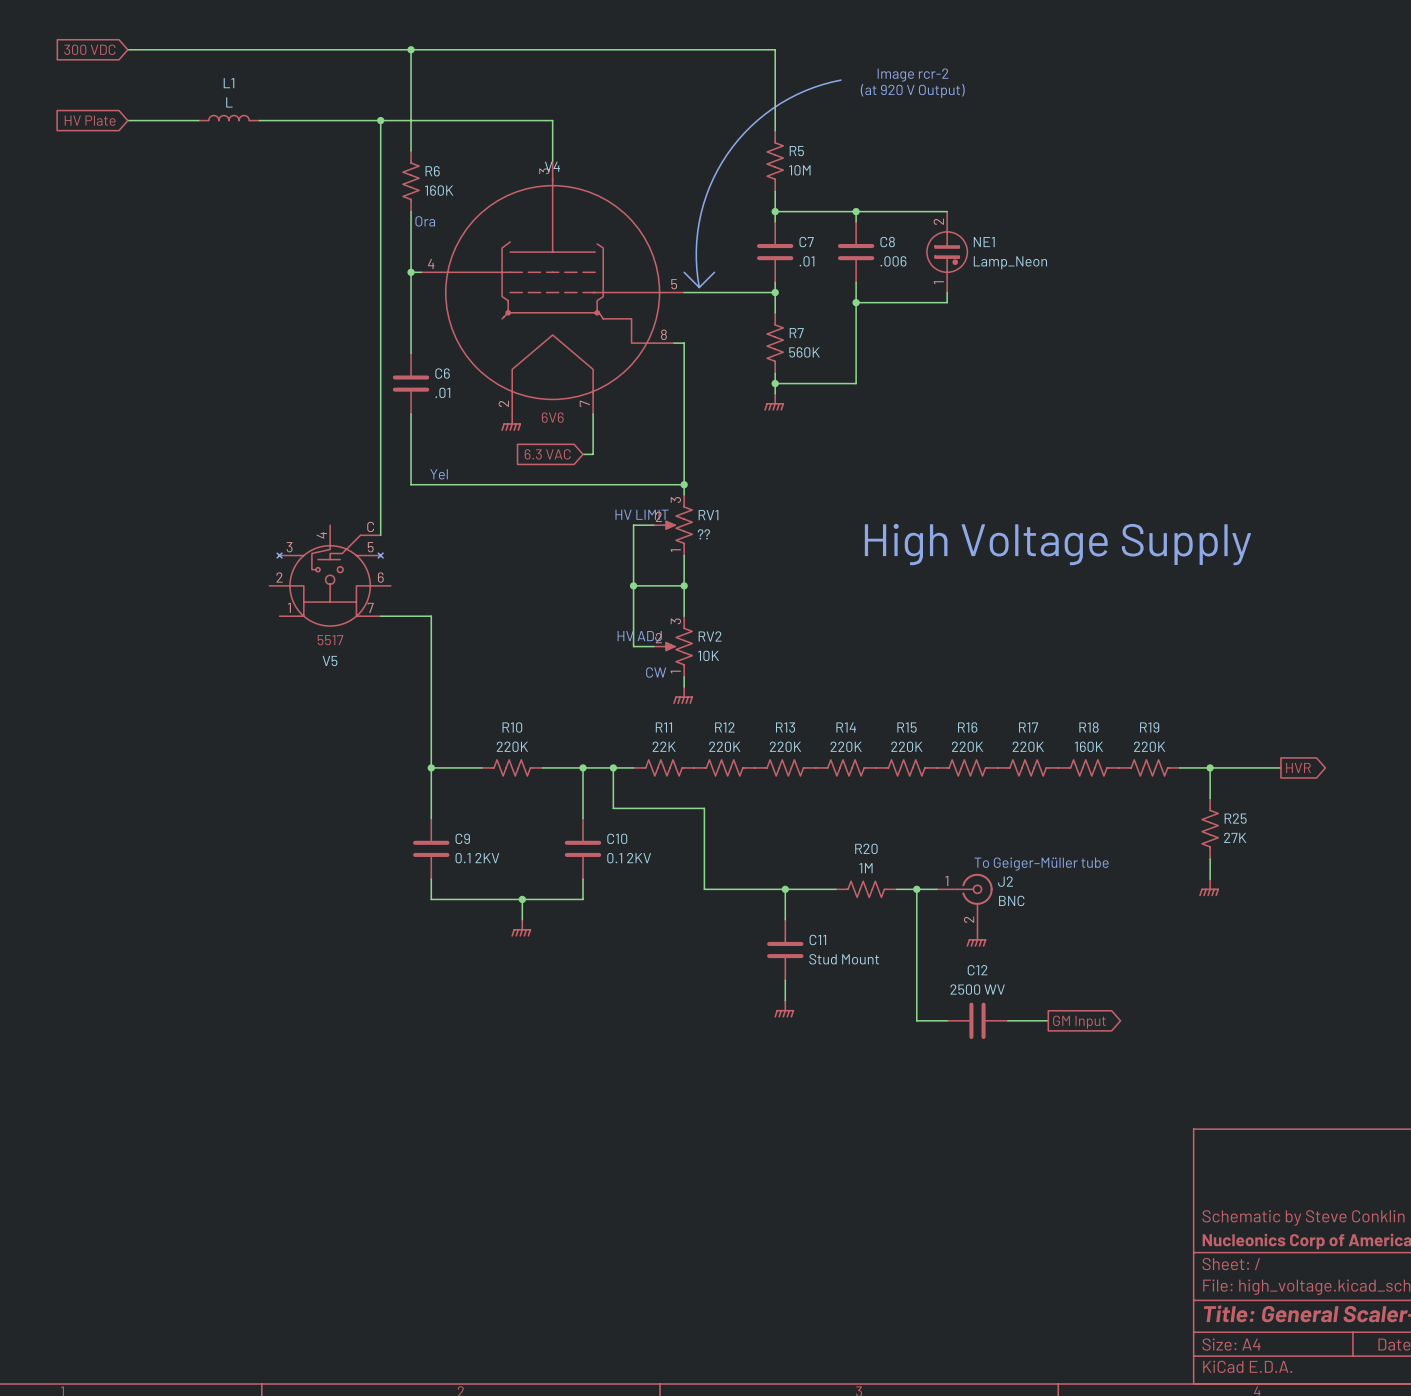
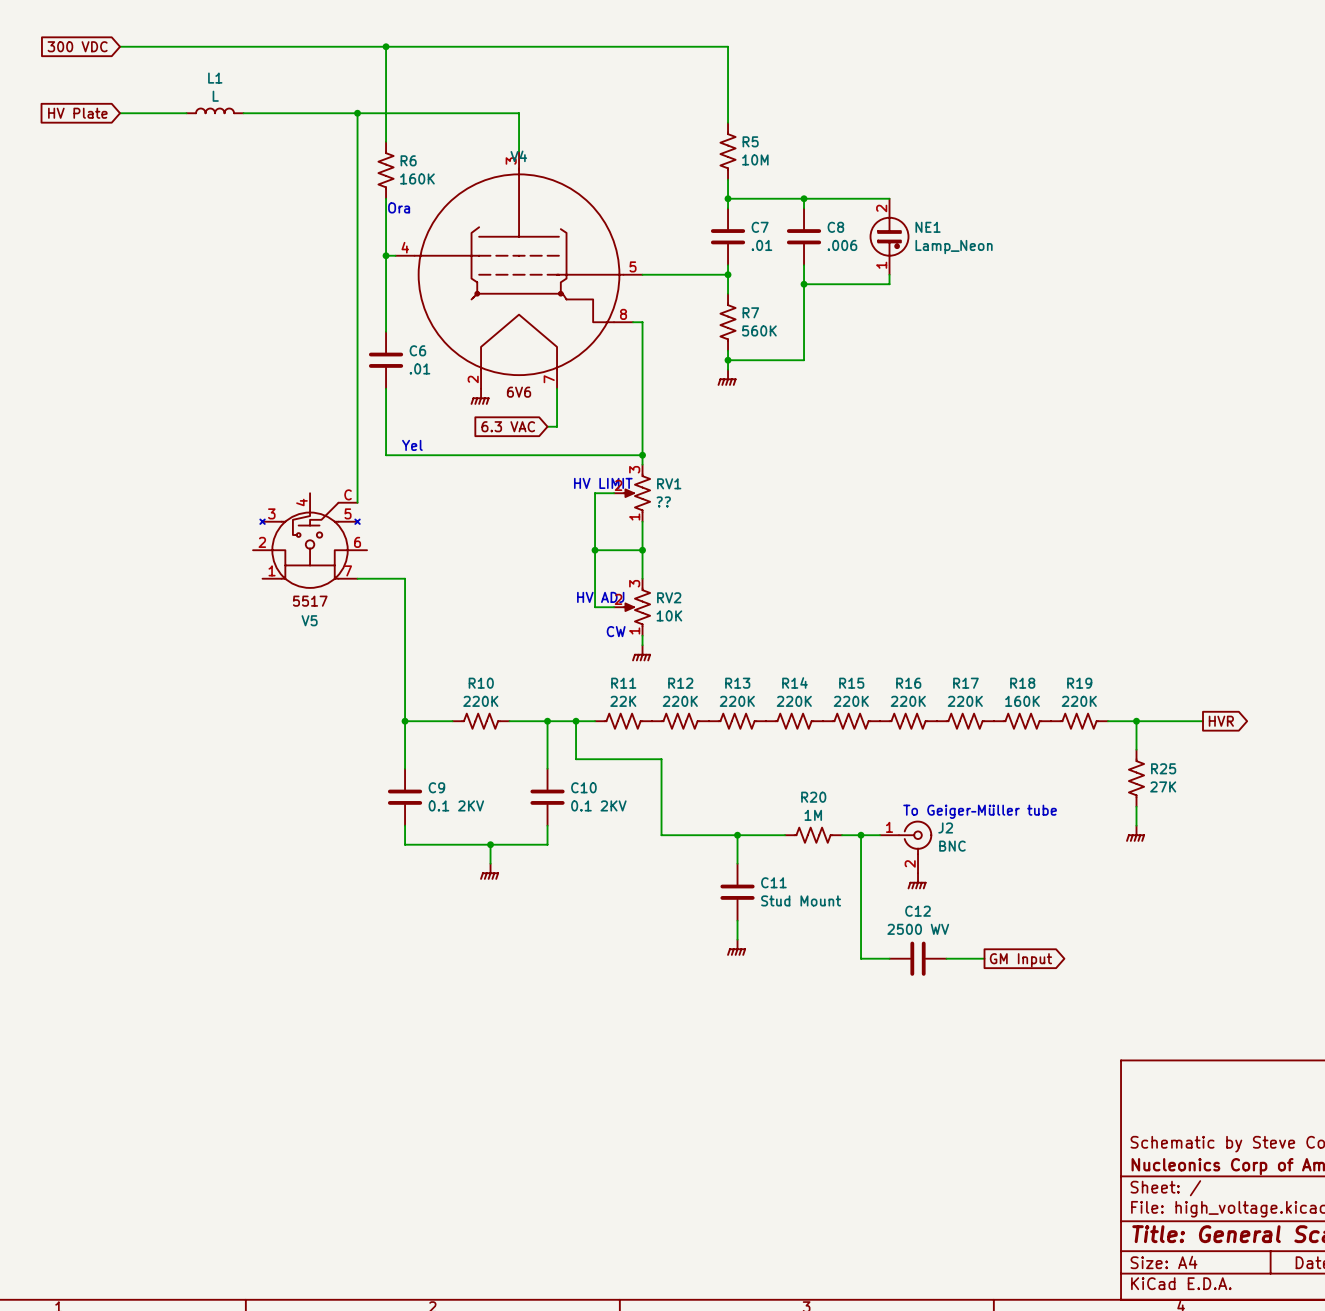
text: Image rcr-2 (913, 75) -> none
line: (840, 80) (814, 87) (780, 103) (751, 126) (727, 154) (709, 187) (701, 213) (696, 250) (699, 287) -> none
text: (at 920 V Output) (912, 90) -> none
line: (684, 272) (699, 287) -> none
line: (714, 272) (699, 287) -> none
text: High Voltage Supply (1058, 544) -> none

